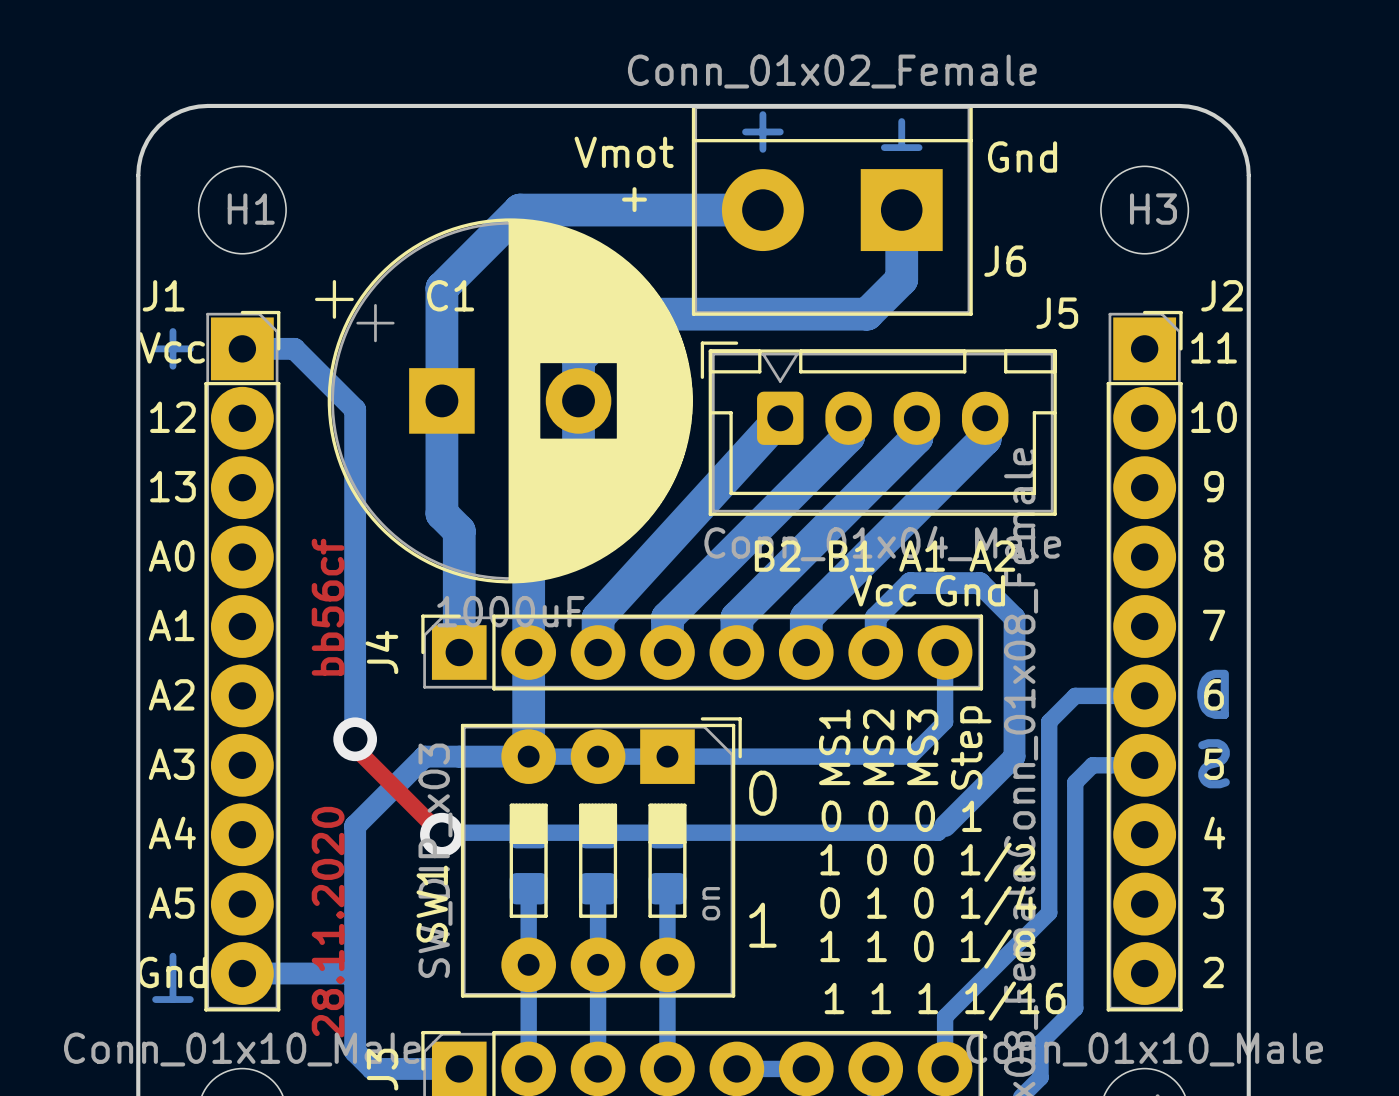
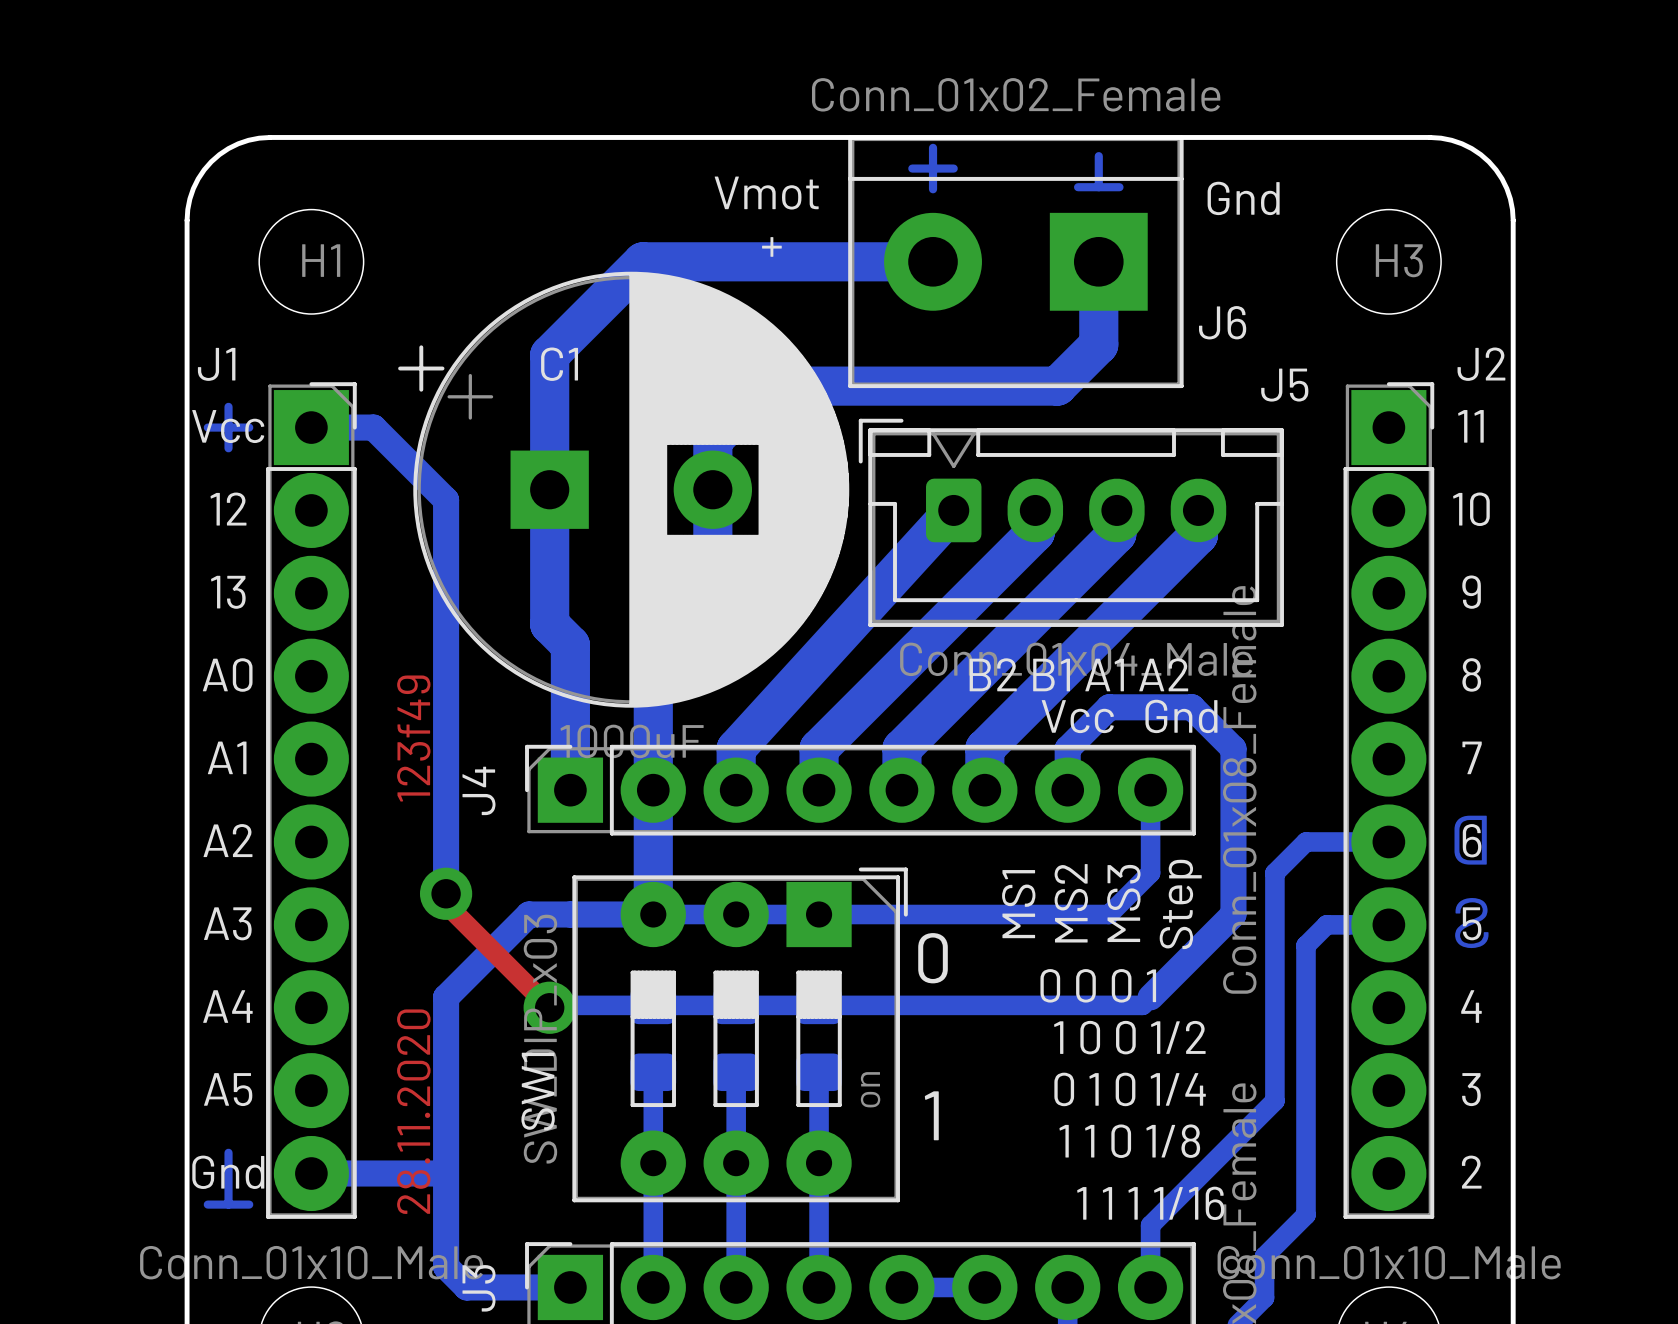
text: bb56cf (328, 607) -> 123f49 (413, 738)

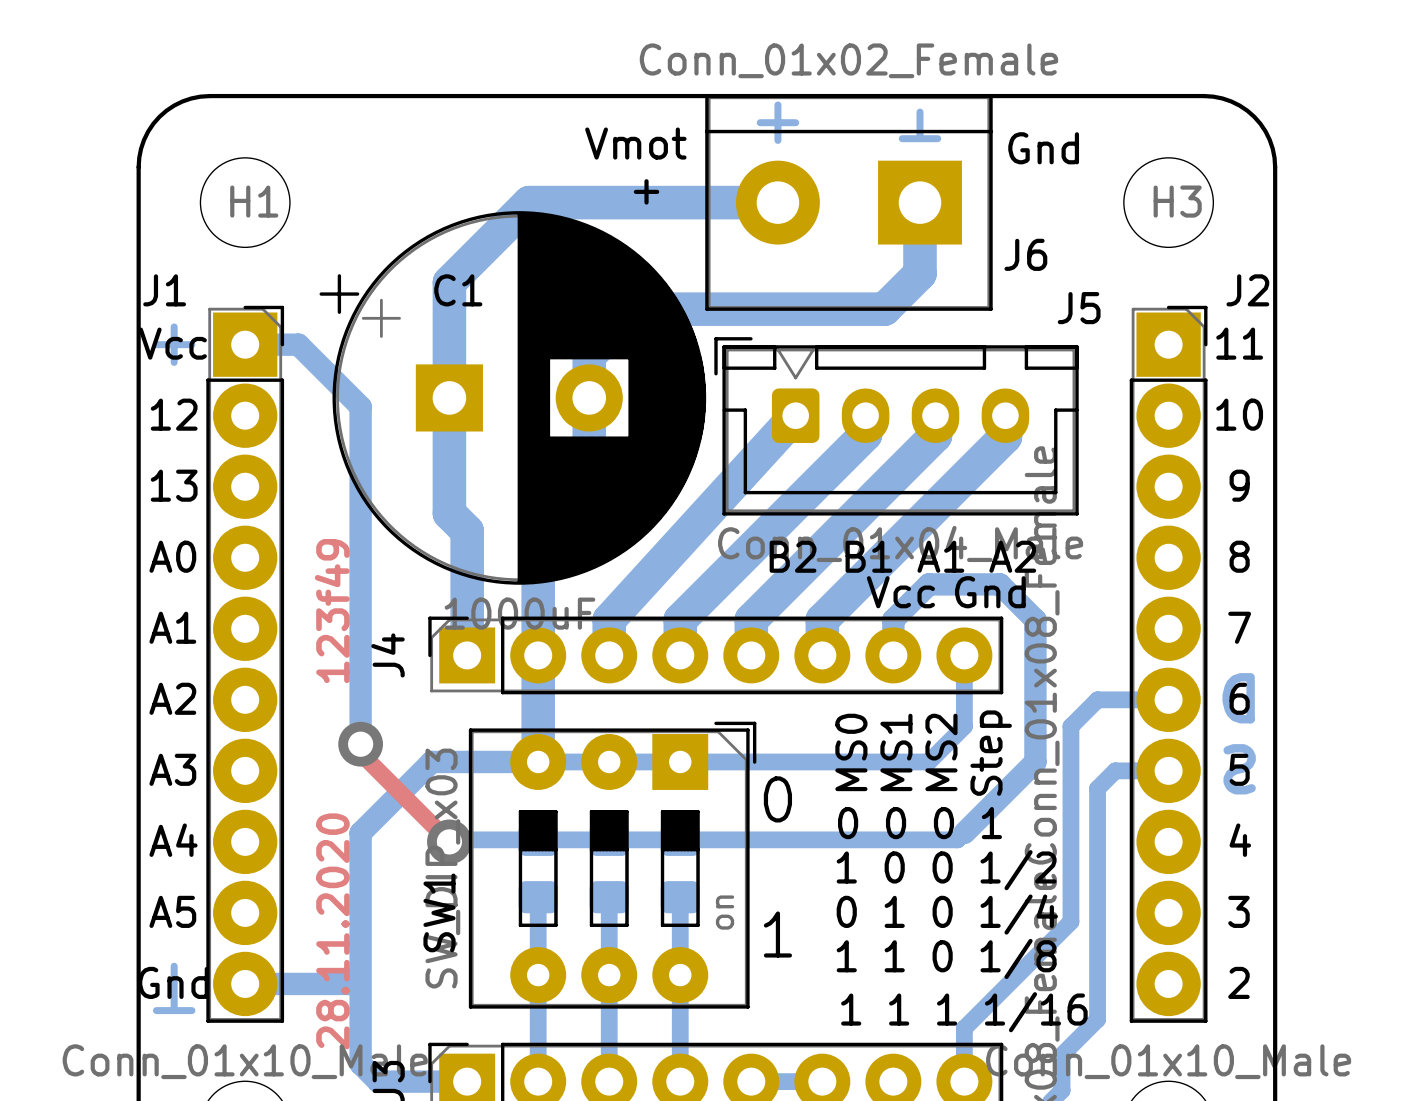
text: MS2 (1071, 903) -> MS1 (896, 752)
text: MS3 (1123, 903) -> MS2 (941, 752)
text: MS1 (1018, 904) -> MS0 (851, 752)

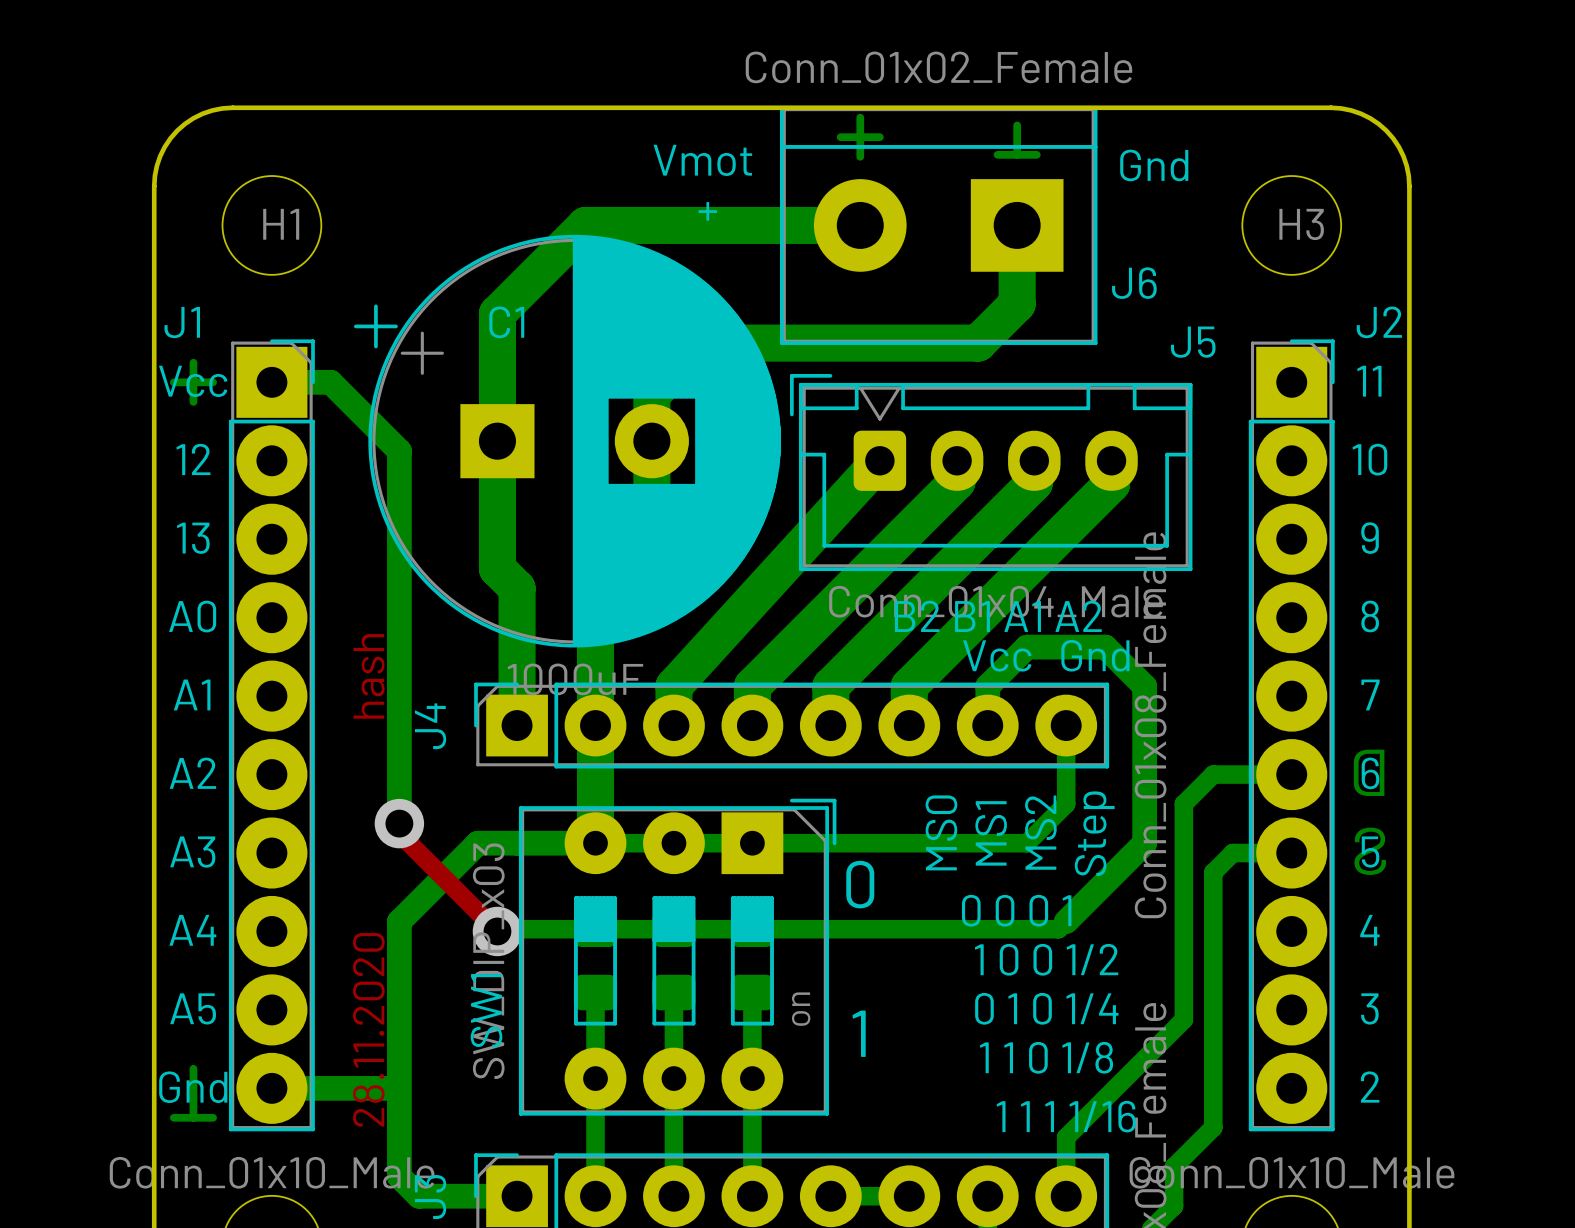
text: 123f49 (332, 611) -> hash (368, 676)

